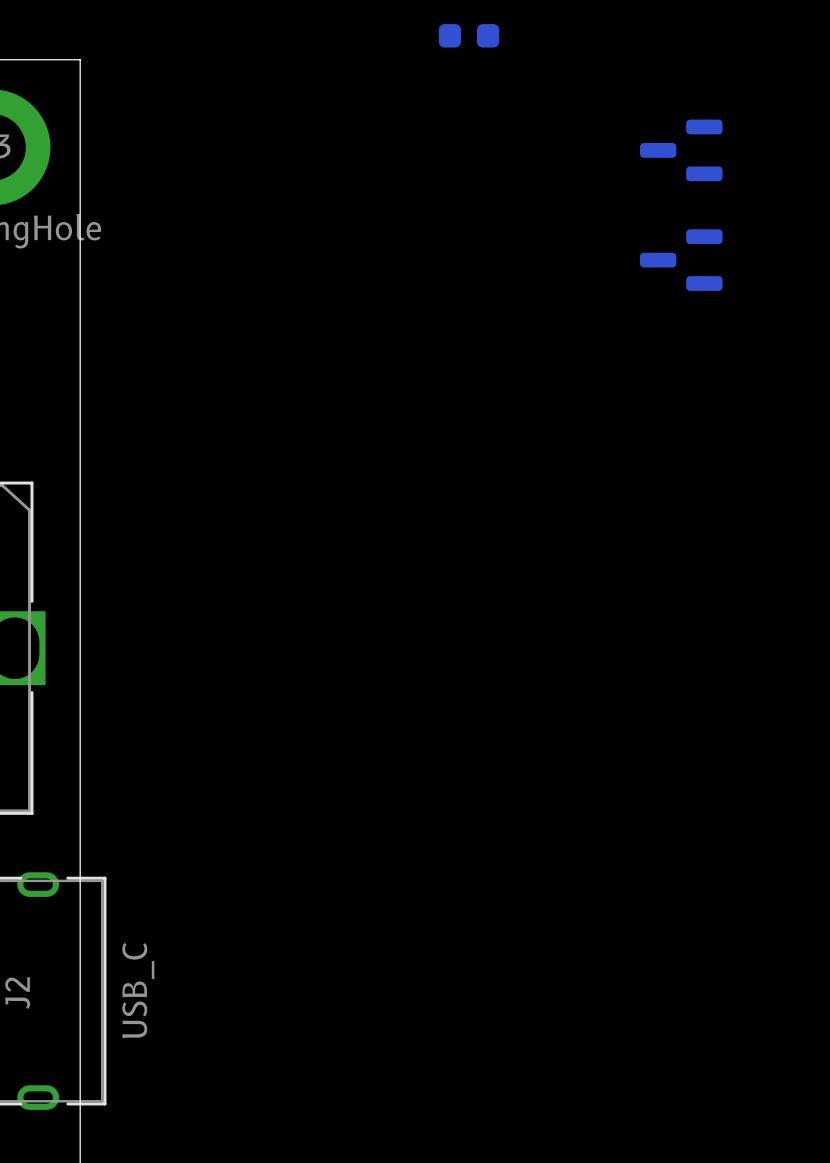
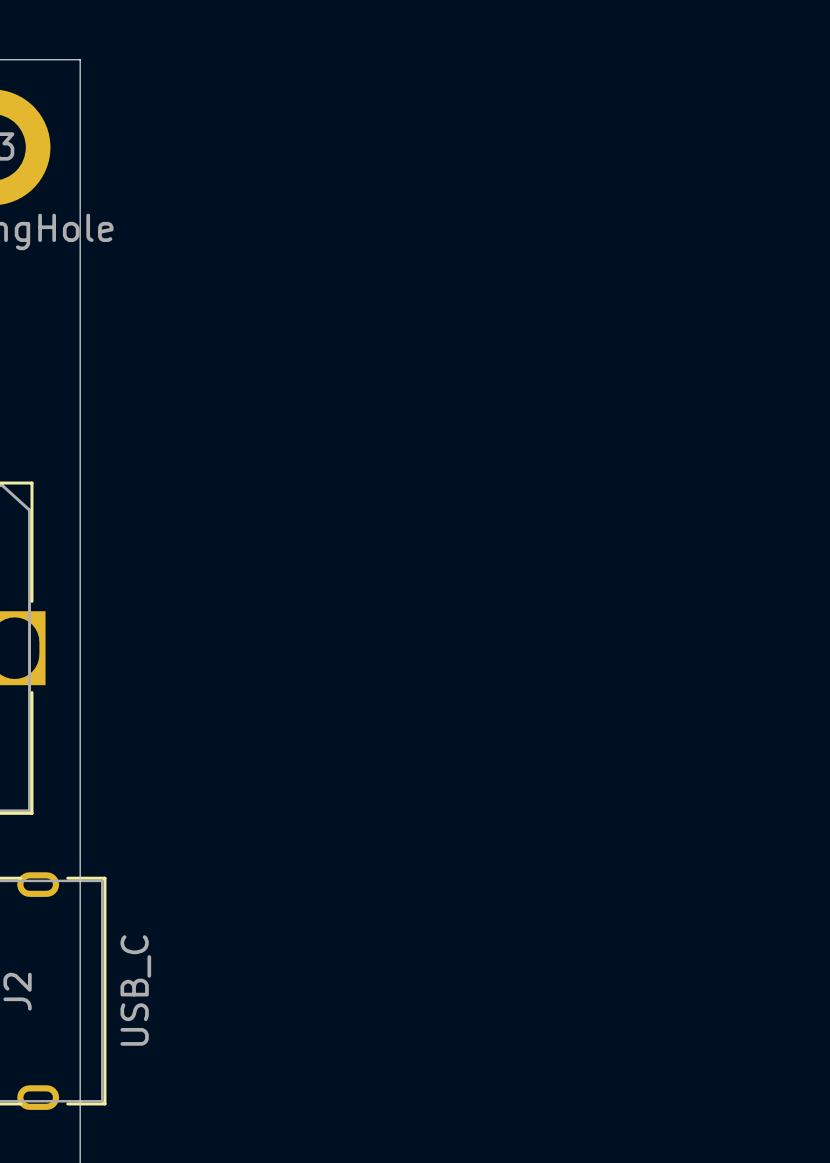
part: (468, 35) -> none
part: (681, 150) -> none
part: (681, 260) -> none

